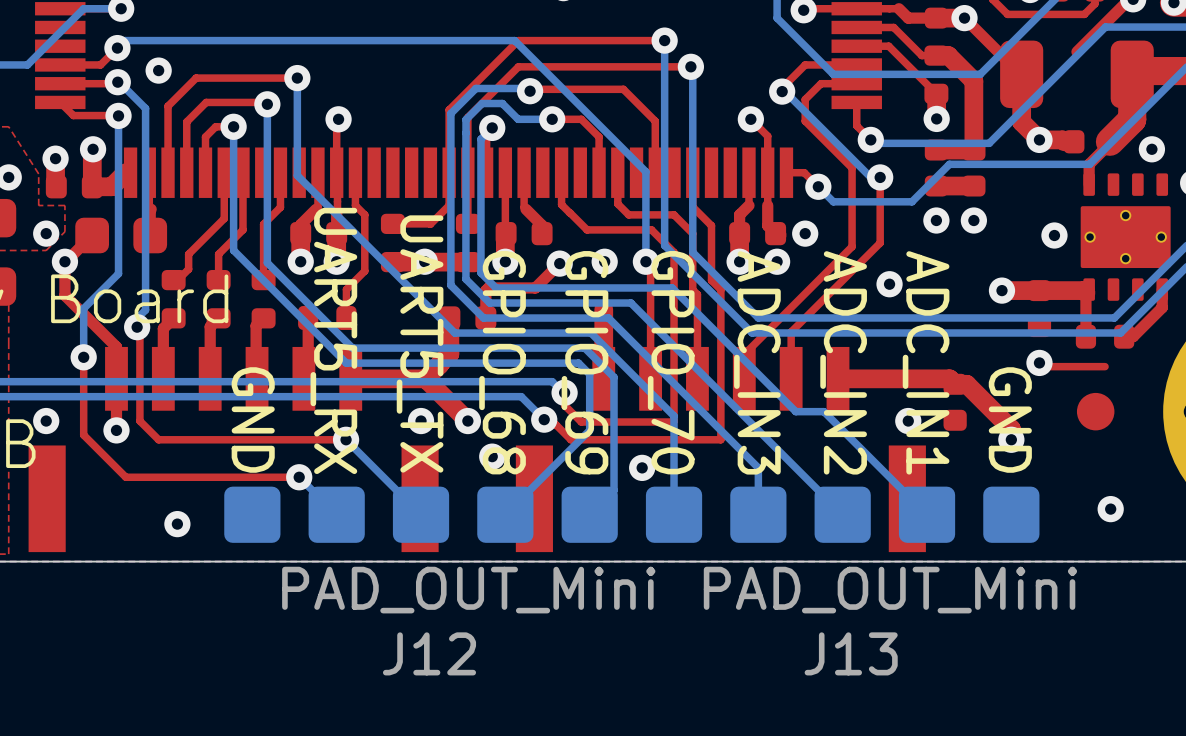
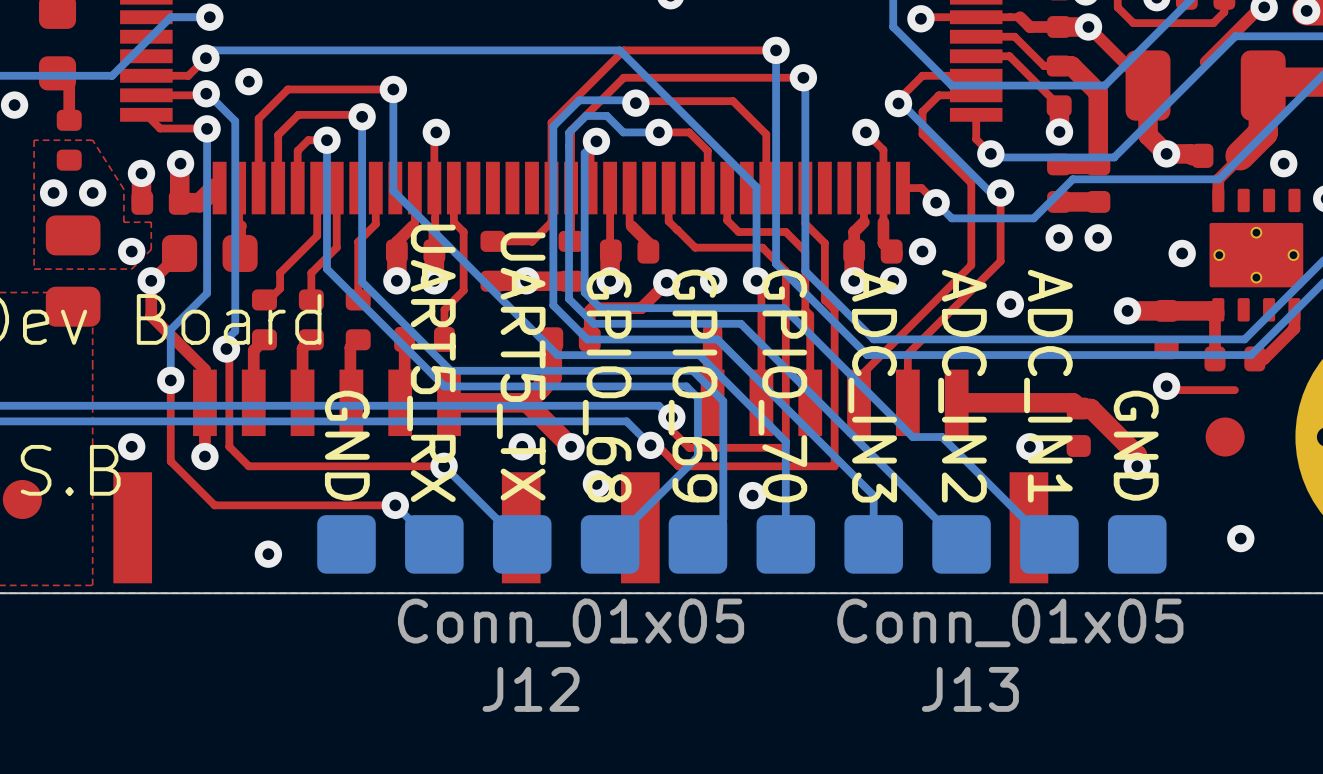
J12 value: PAD_OUT_Mini (468, 590) -> Conn_01x05 (571, 622)
J13 value: PAD_OUT_Mini (890, 590) -> Conn_01x05 (1010, 622)

